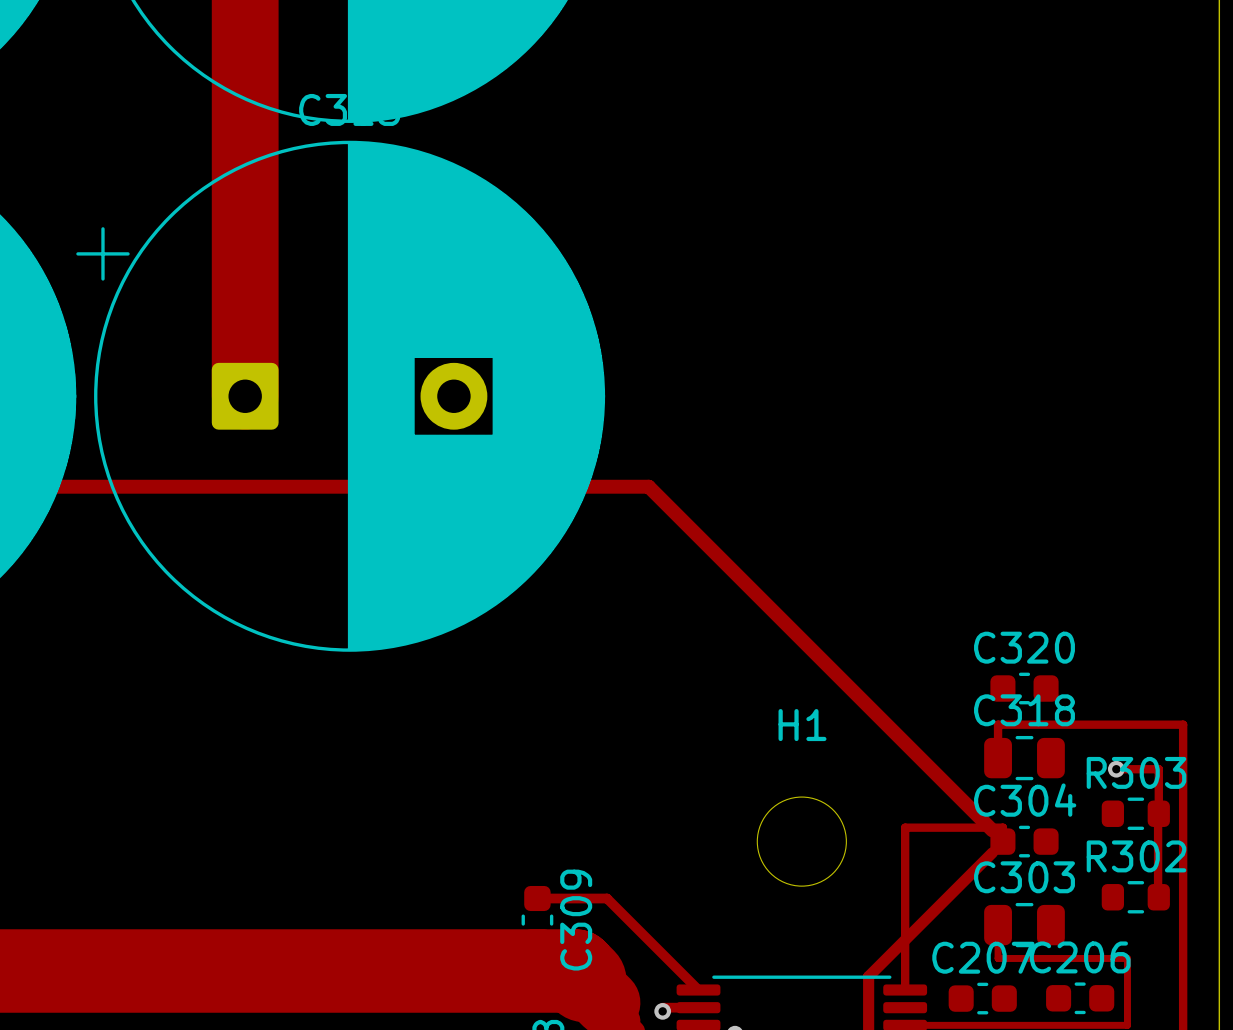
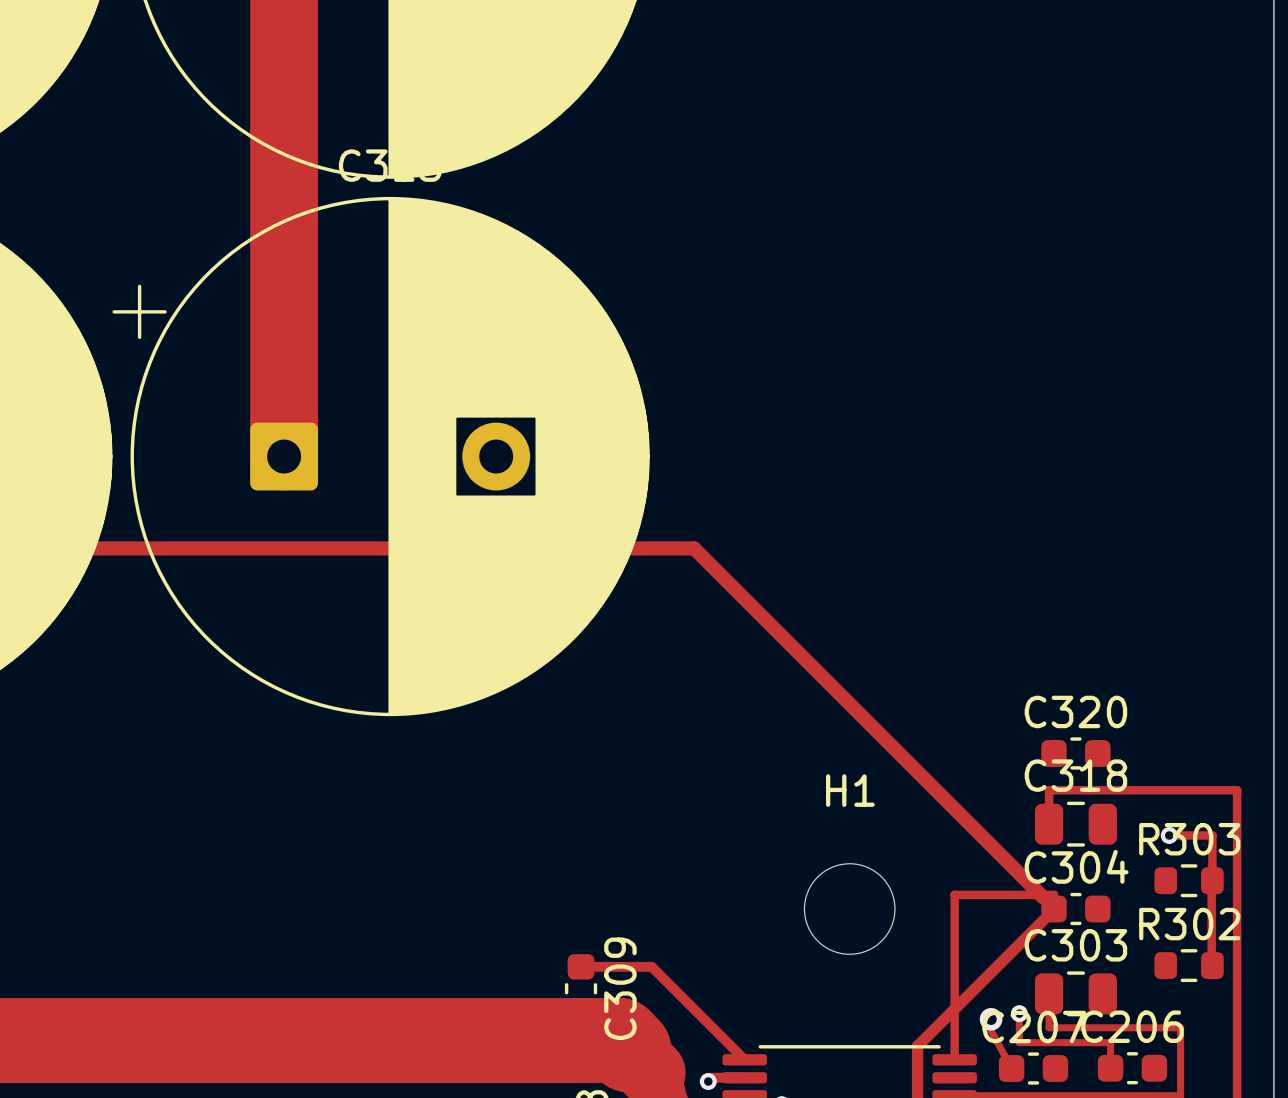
track: none -> (1019, 1013) (1019, 1042) (1110, 1042) (1110, 1068)
via: none -> (1019, 1013)
track: none -> (991, 1019) (991, 1030) (1011, 1068)
via: none -> (991, 1019)

